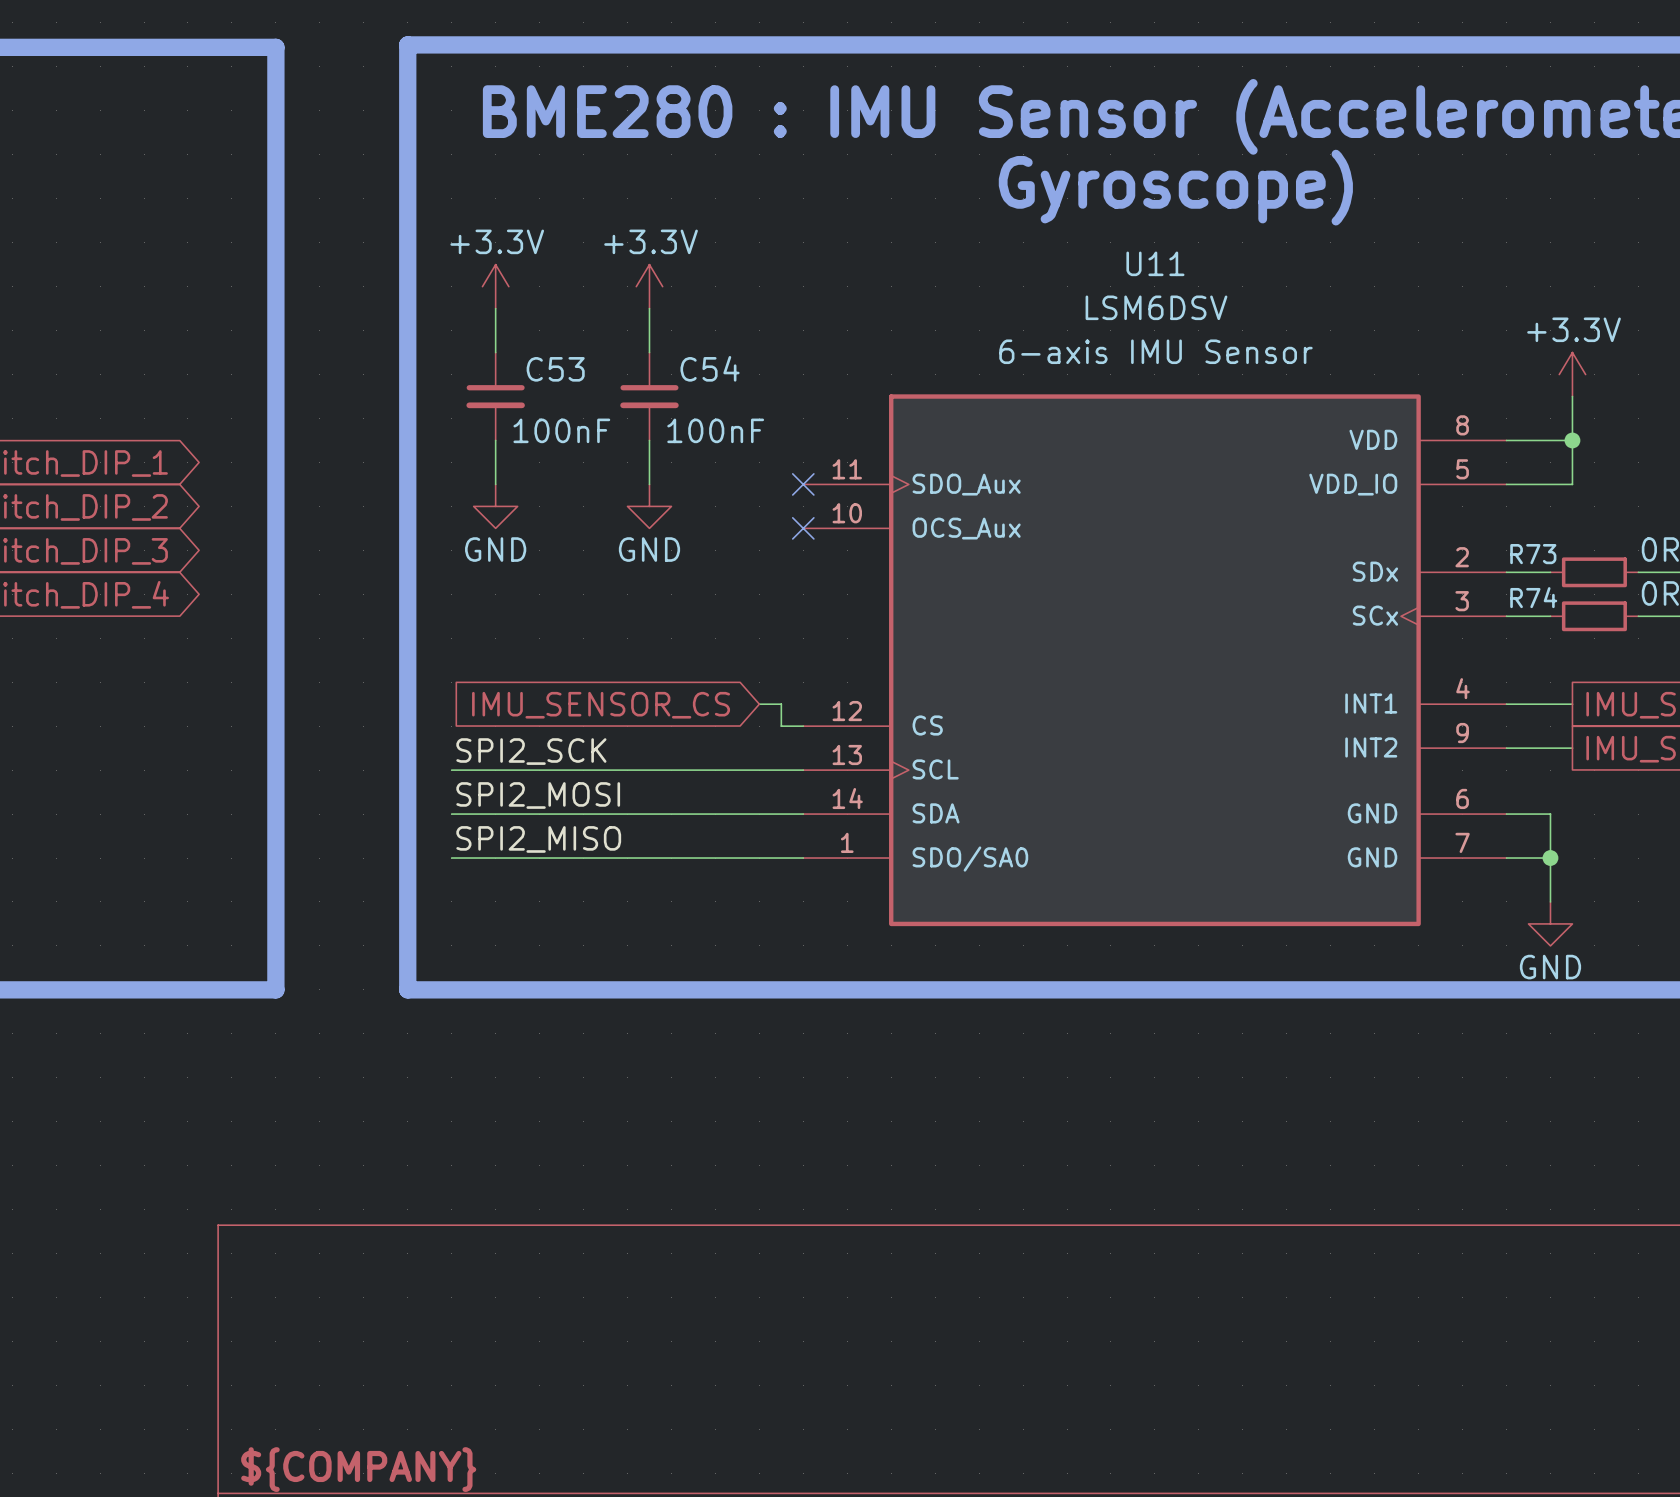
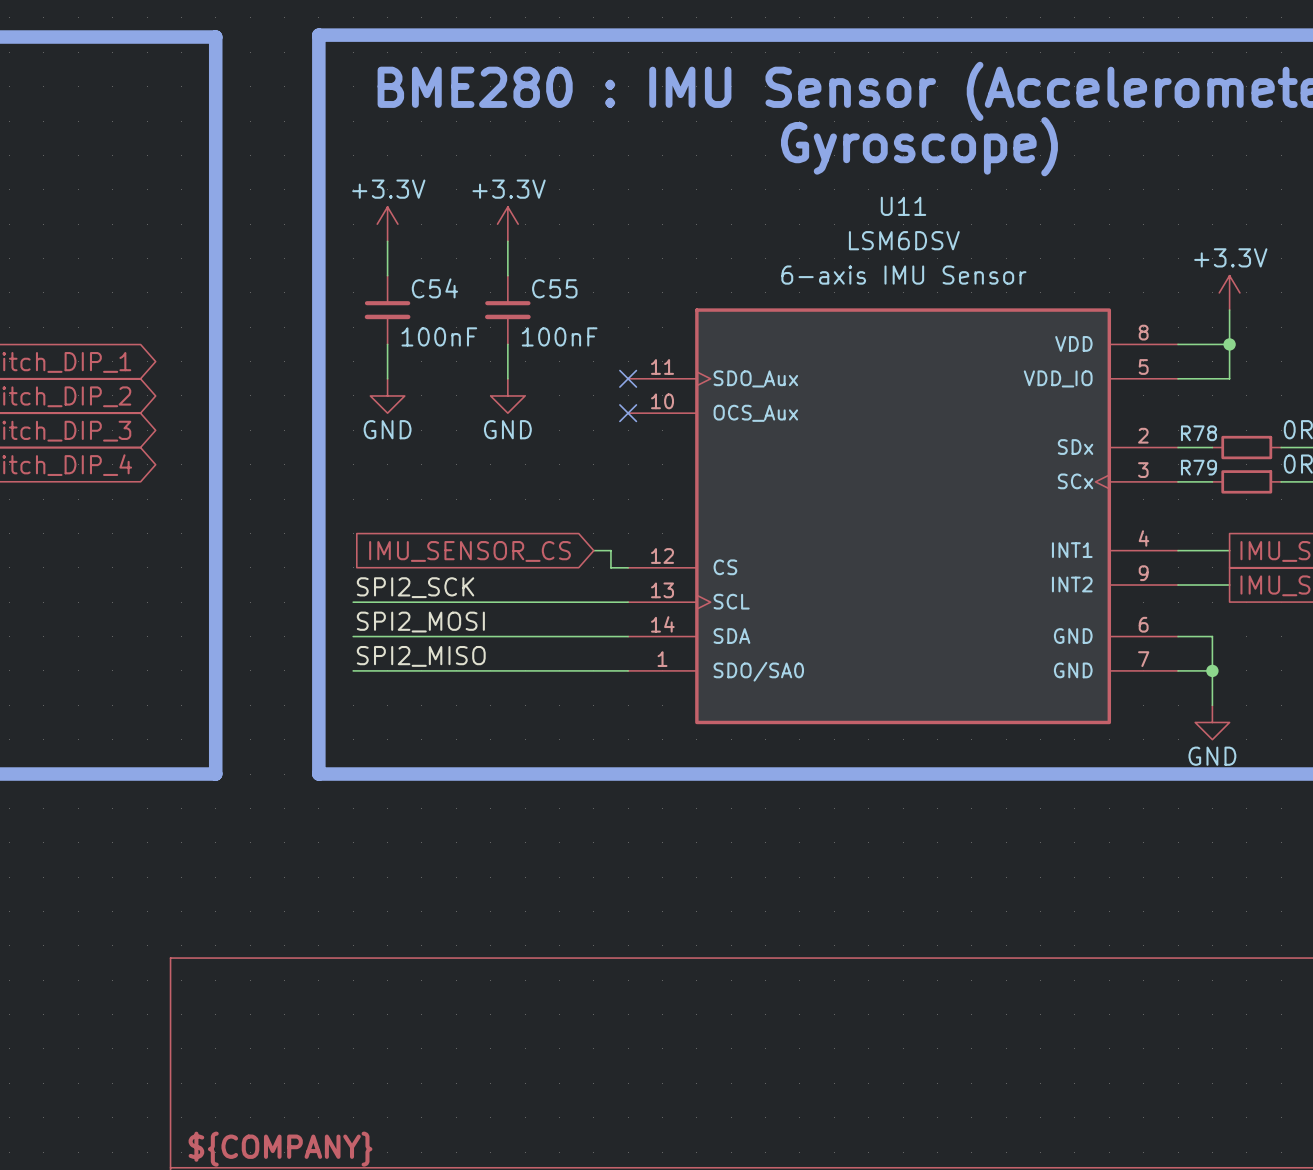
C54 name: C54 (710, 368) -> C55 (554, 288)
C53 name: C53 (555, 369) -> C54 (434, 288)
R73 name: R73 (1533, 554) -> R78 (1198, 433)
R74 name: R74 (1533, 597) -> R79 (1198, 467)

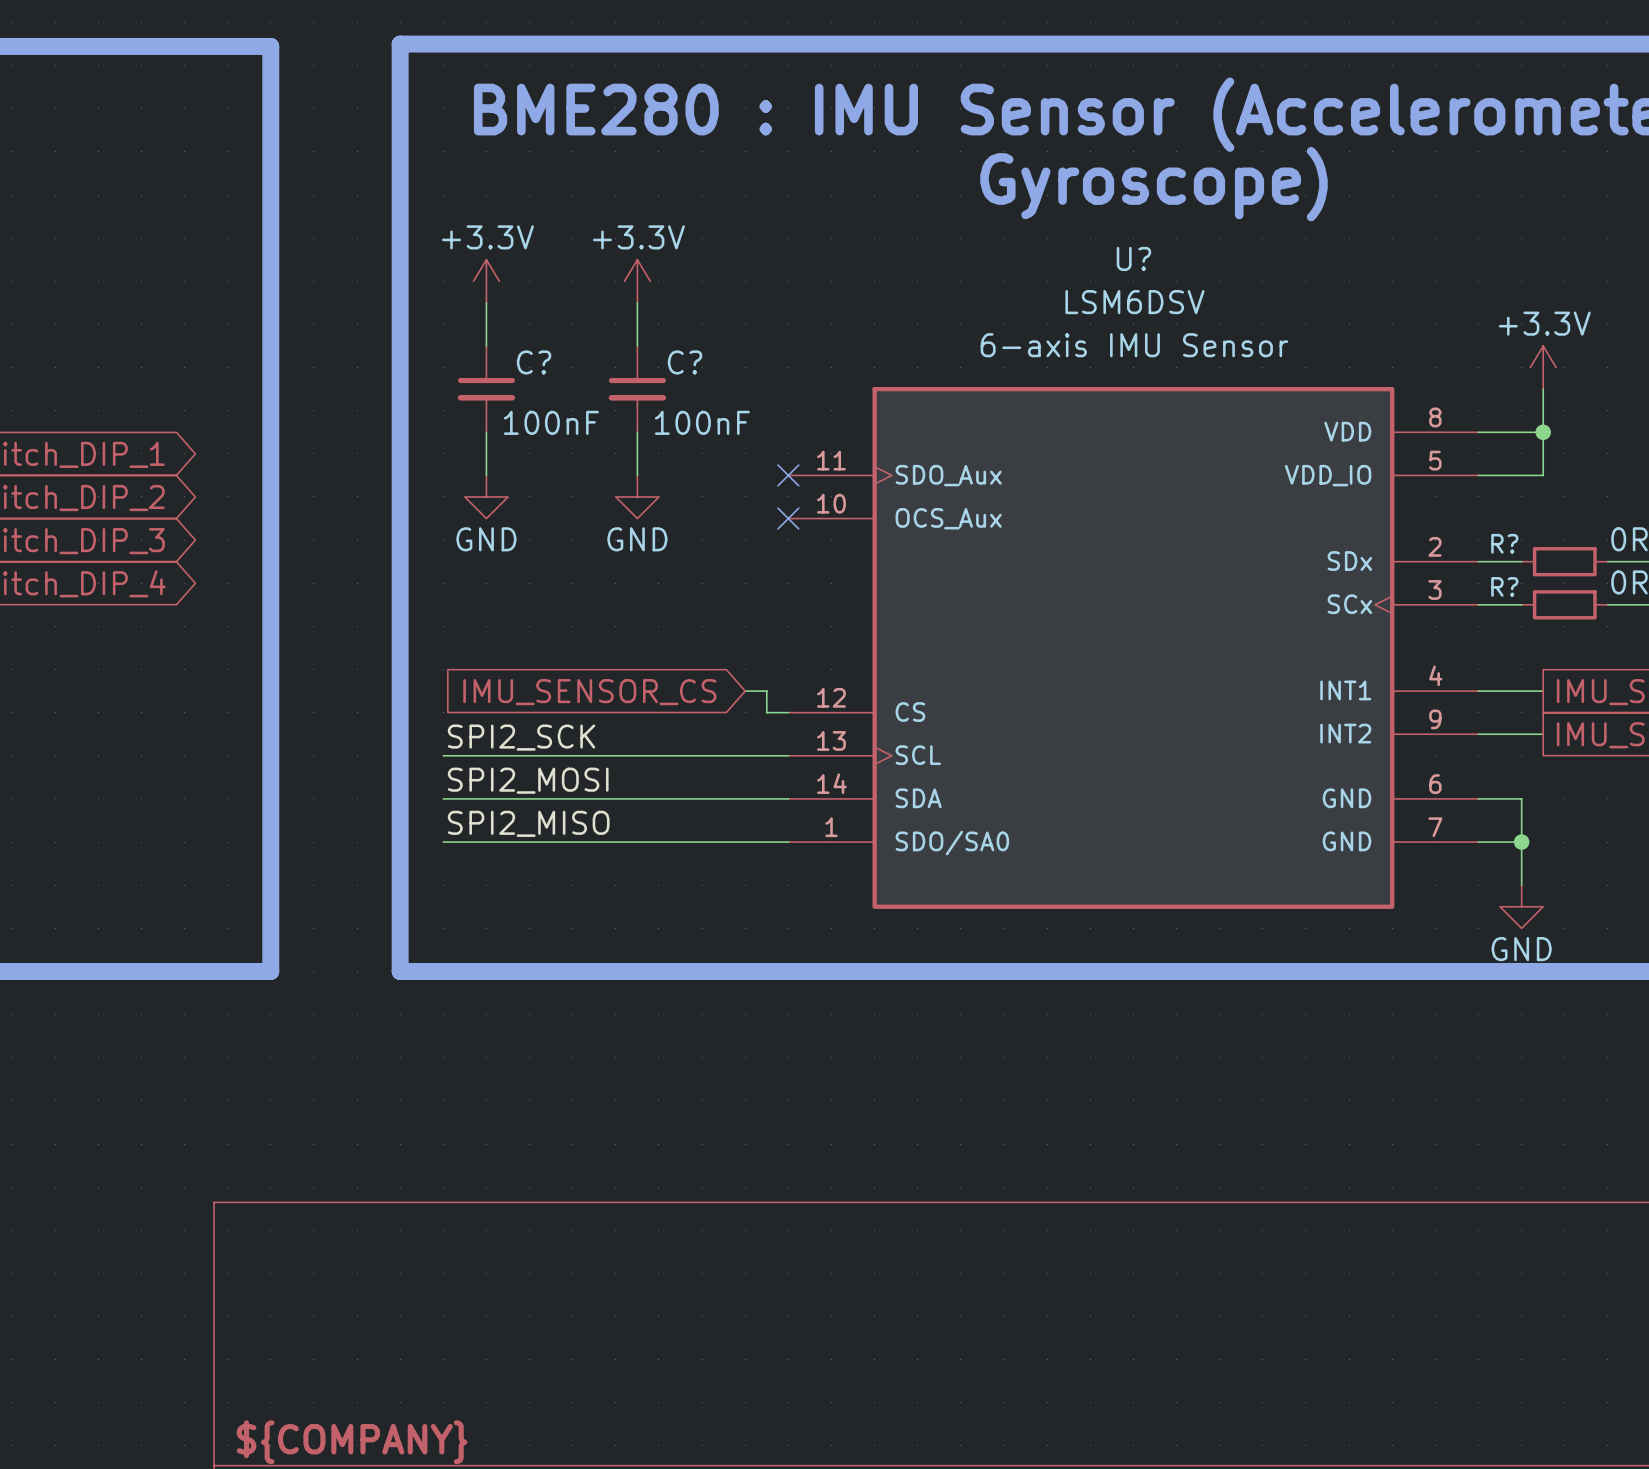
U11 name: U11 (903, 206) -> U? (1133, 258)
C54 name: C54 (434, 288) -> C? (534, 362)
C55 name: C55 (554, 288) -> C? (685, 362)
R78 name: R78 (1198, 433) -> R? (1504, 543)
R79 name: R79 (1198, 467) -> R? (1504, 586)

